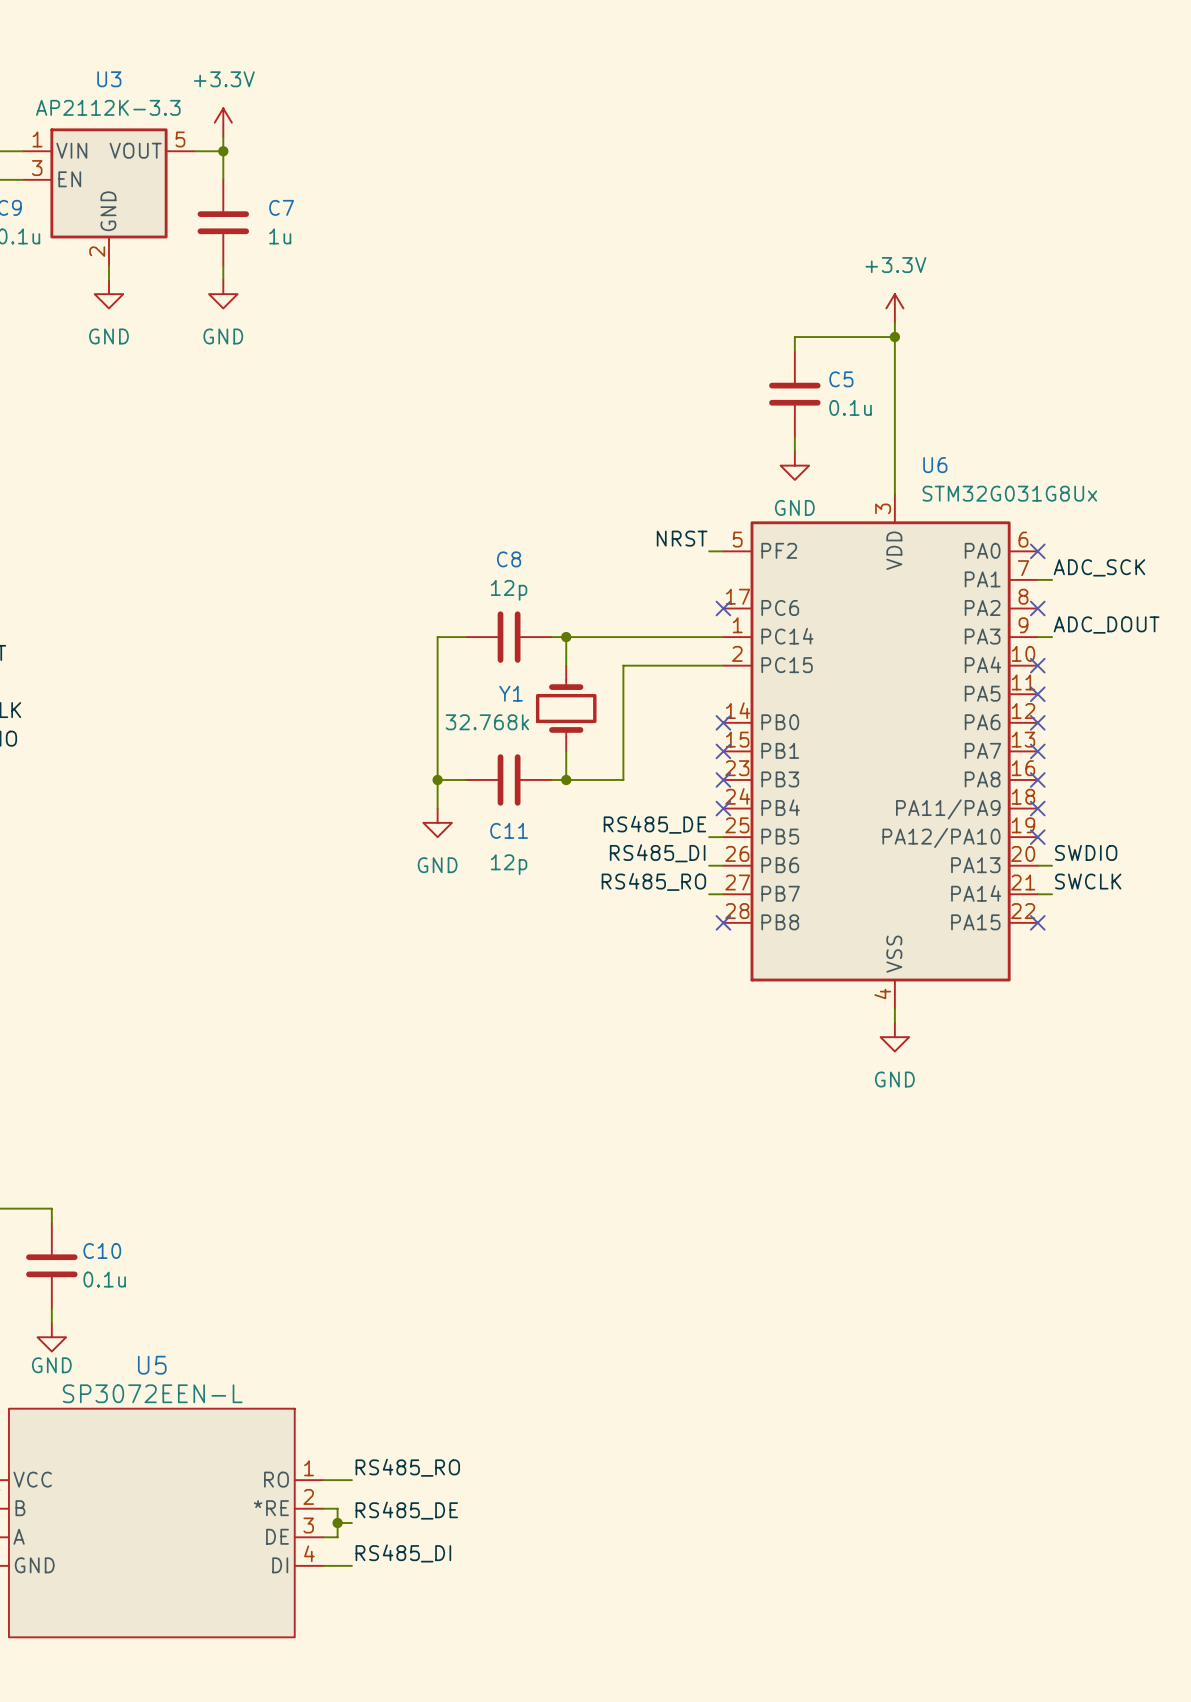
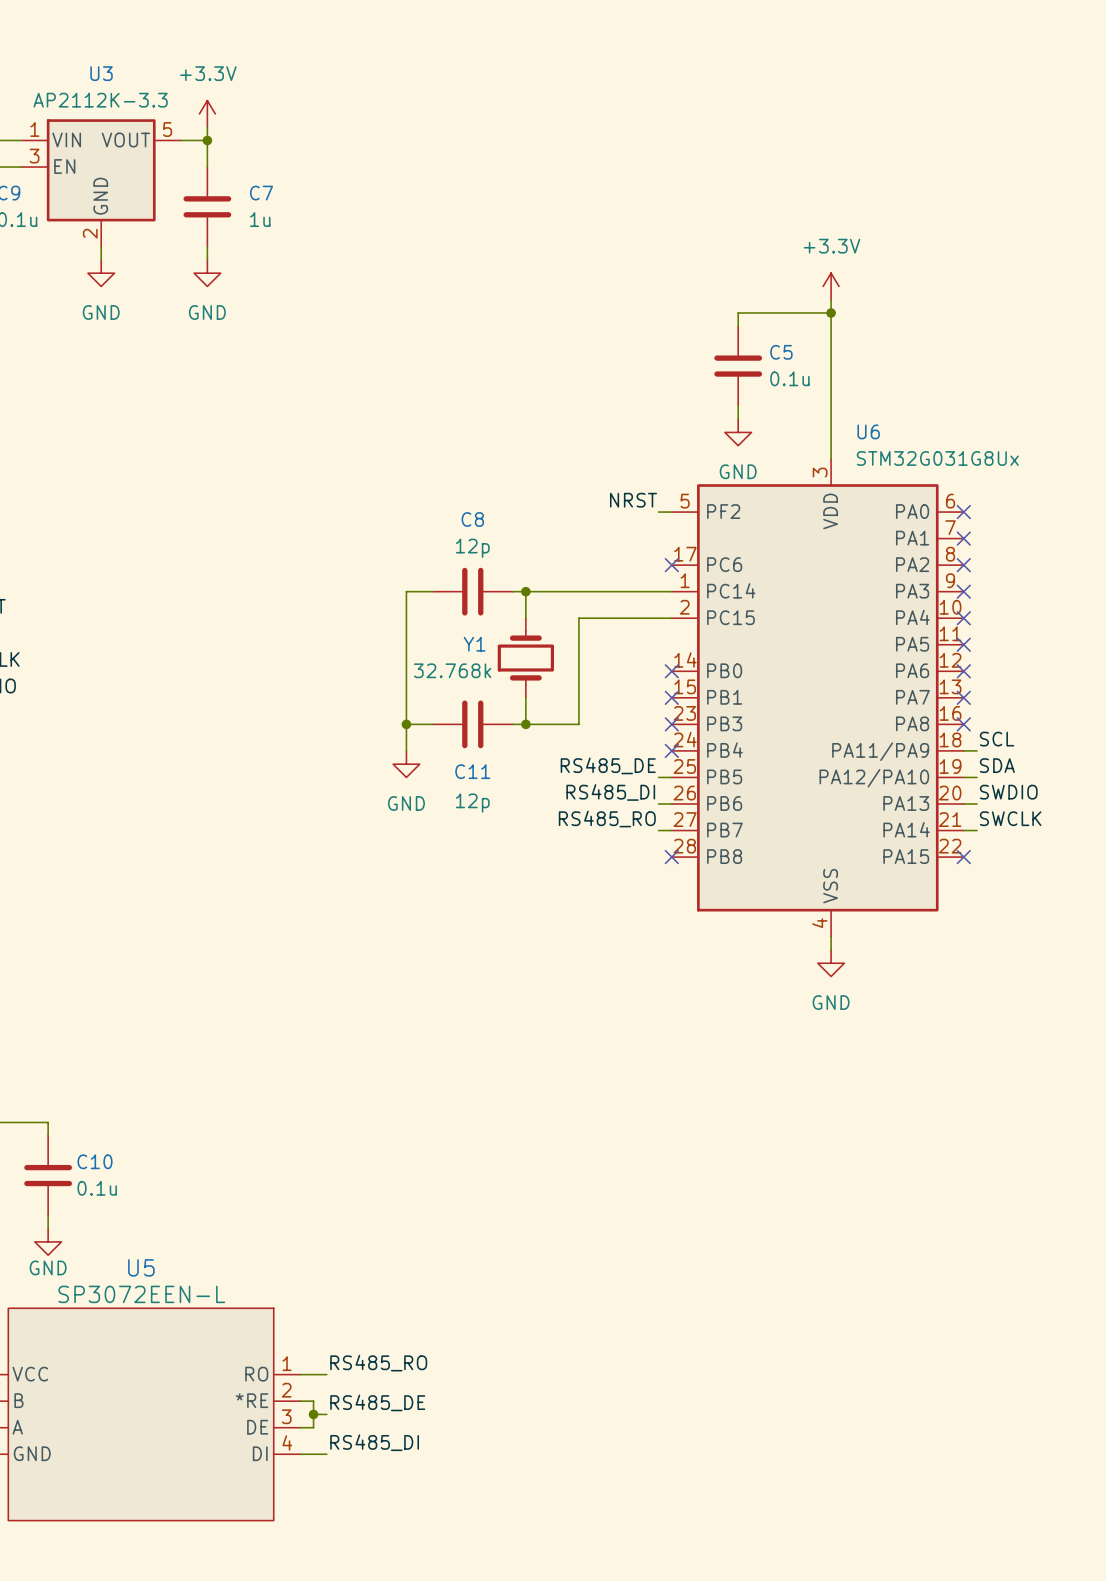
label: ADC_SCK (1099, 567) -> none
wire: (1037, 579) (1052, 579) -> (963, 777) (977, 777)
no-connect mark: none -> (963, 538)
label: ADC_DOUT (1106, 625) -> none
wire: (1037, 637) (1052, 637) -> (963, 750) (977, 750)
no-connect mark: none -> (963, 591)
label: none -> SCL (997, 739)
no-connect mark: (1037, 808) -> none
label: none -> SDA (997, 765)
no-connect mark: (1037, 837) -> none

